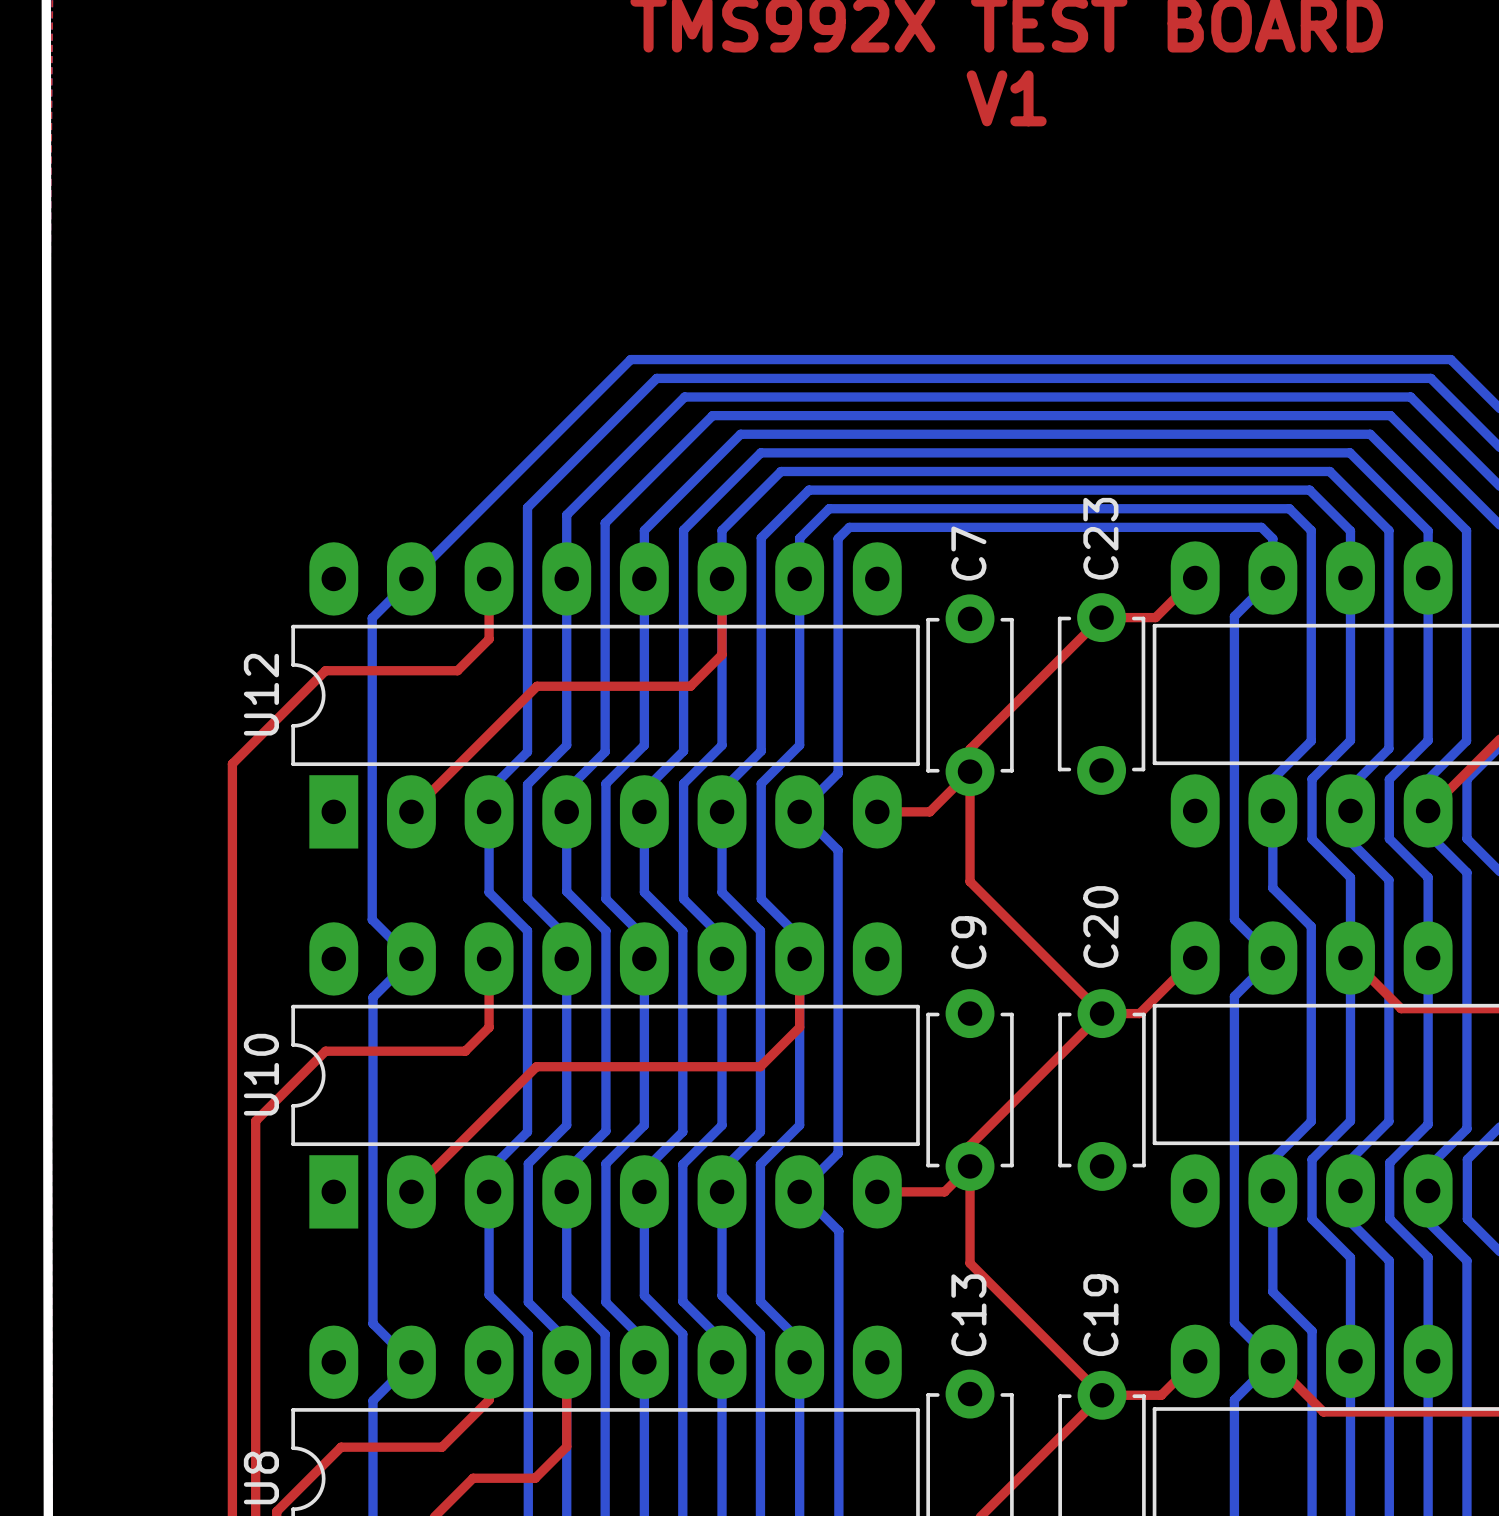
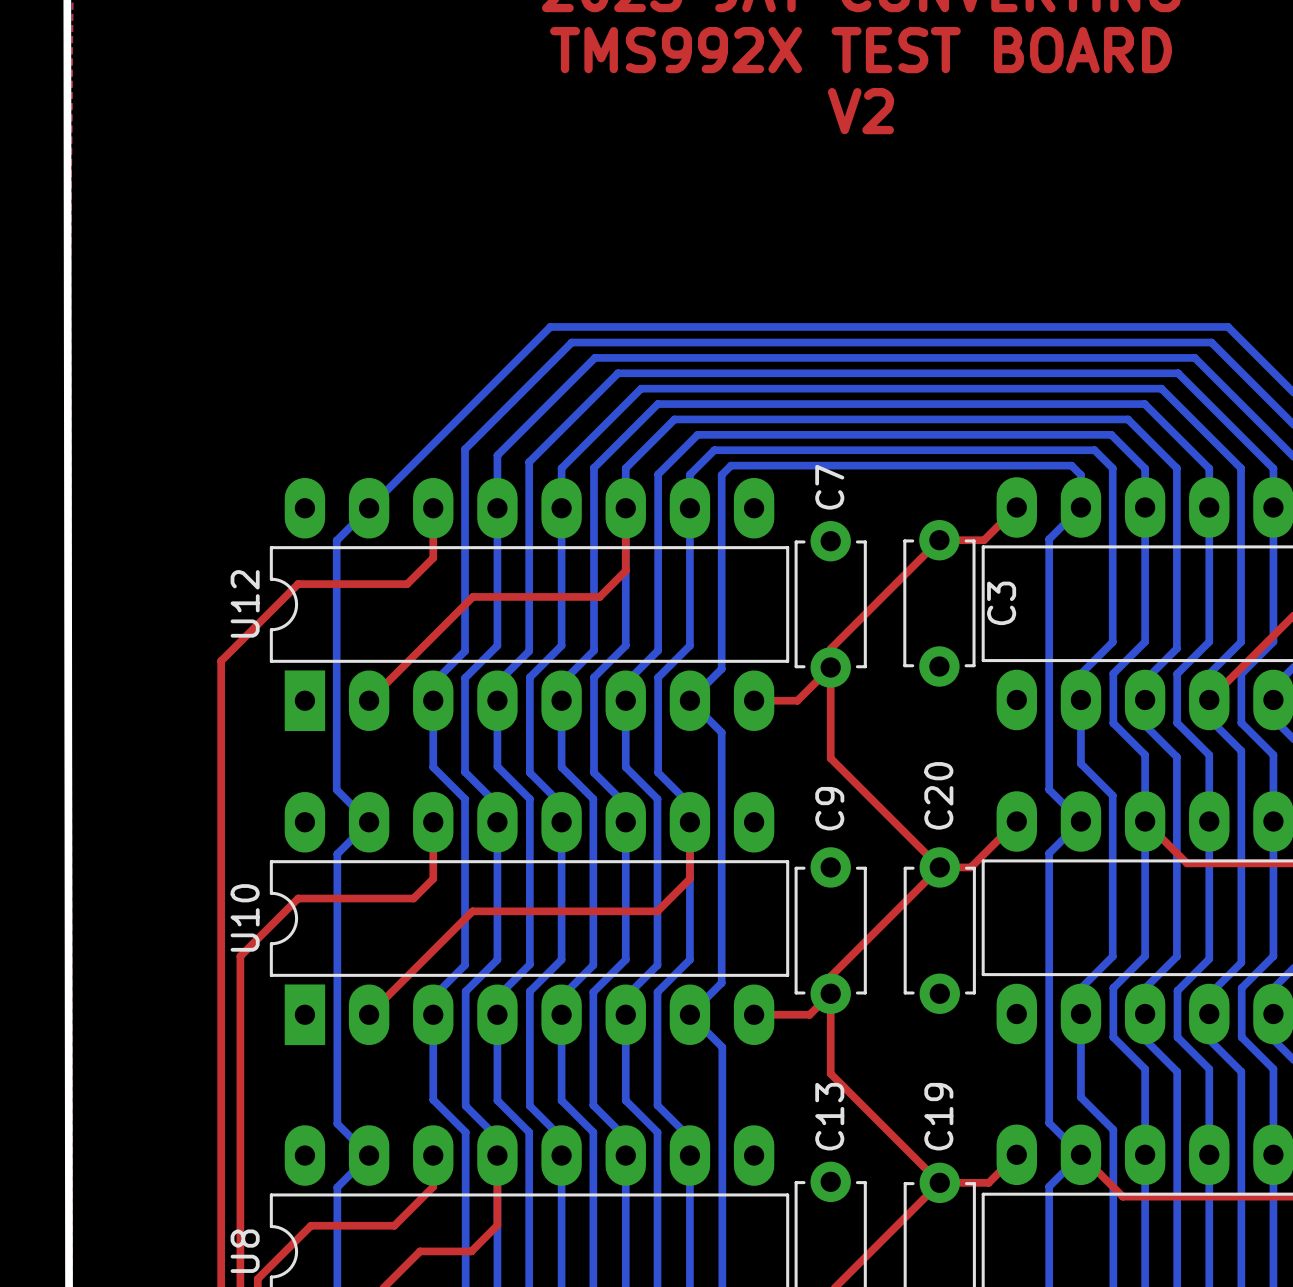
text: V1 (1006, 98) -> V2 (860, 111)
C23 name: C23 (1100, 538) -> C3 (1001, 603)

